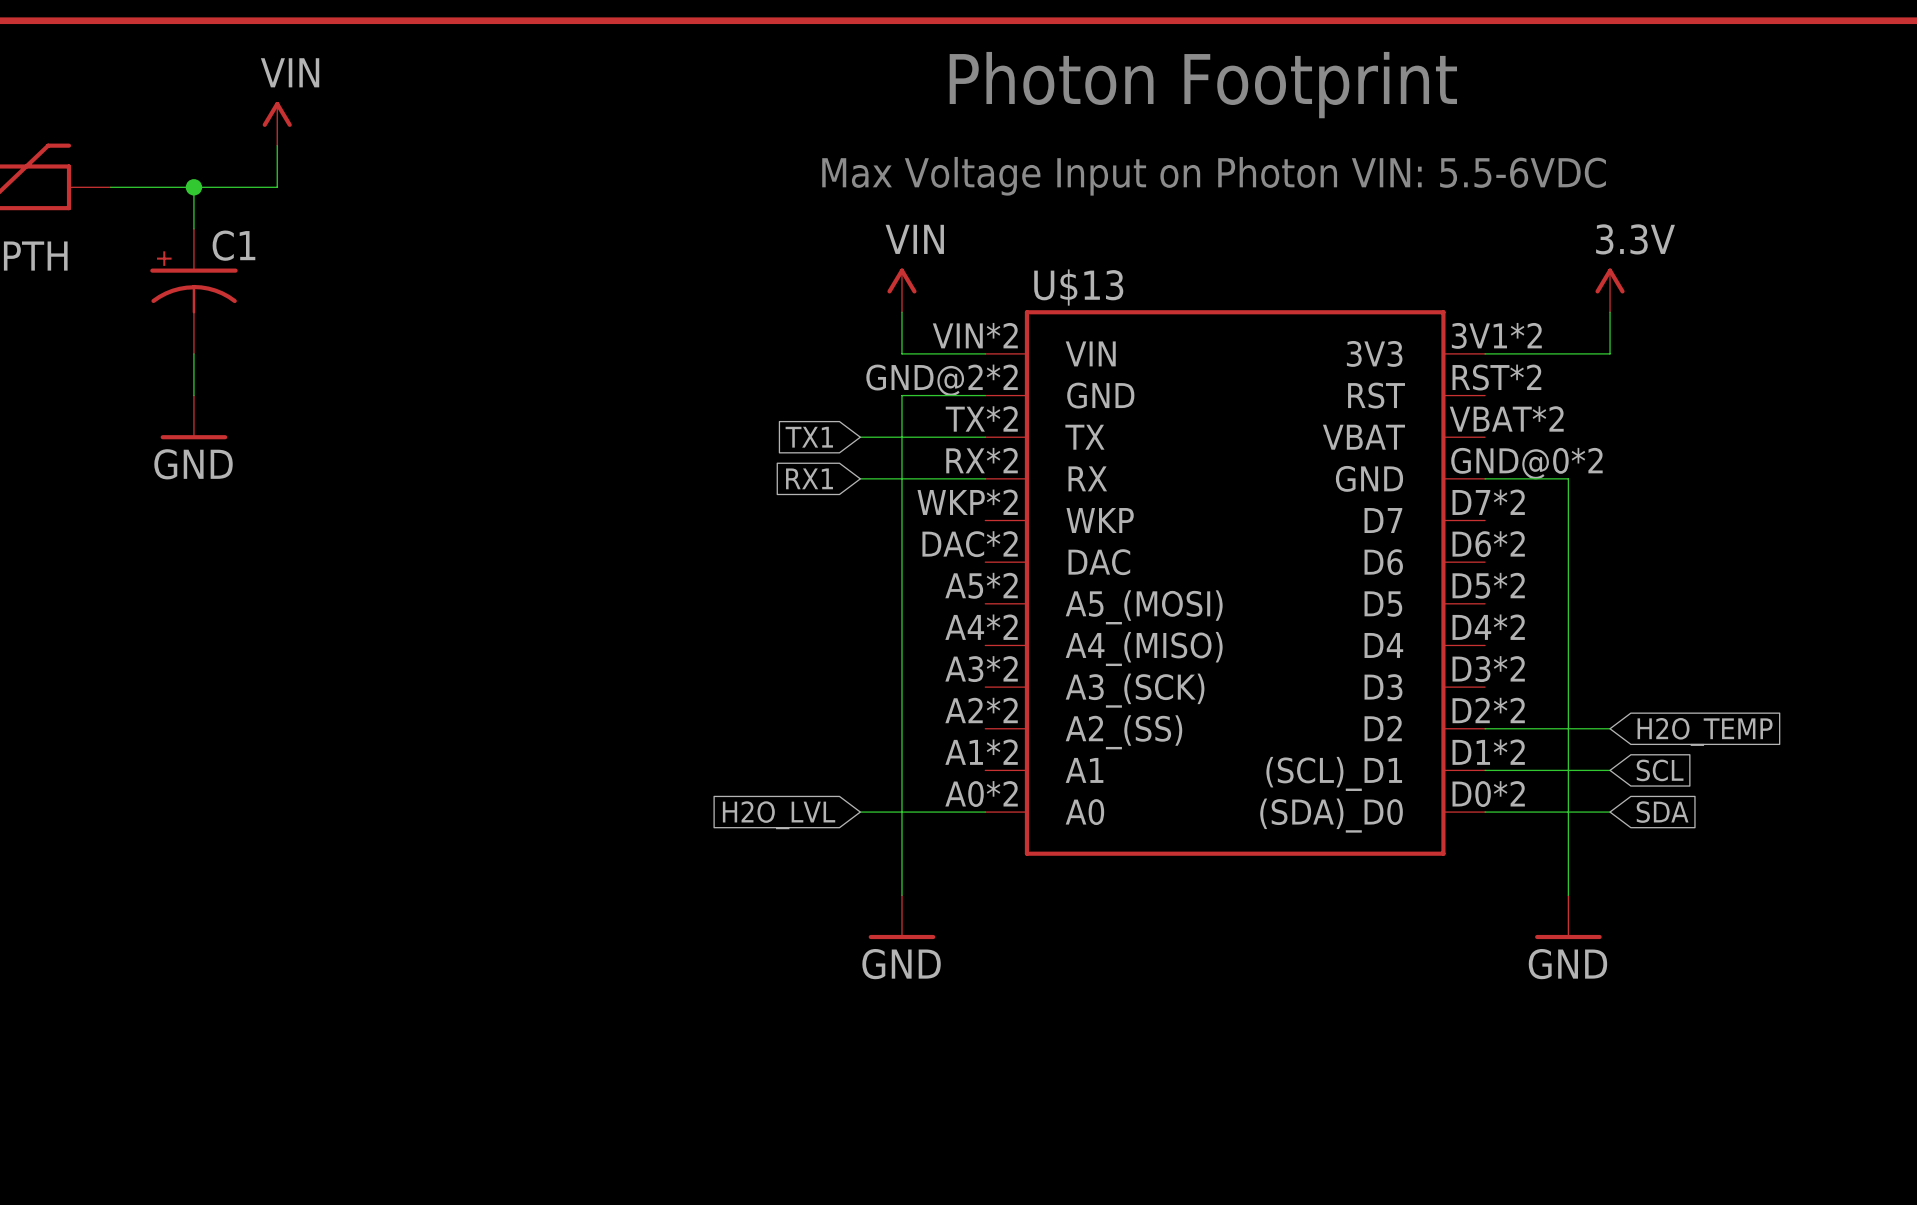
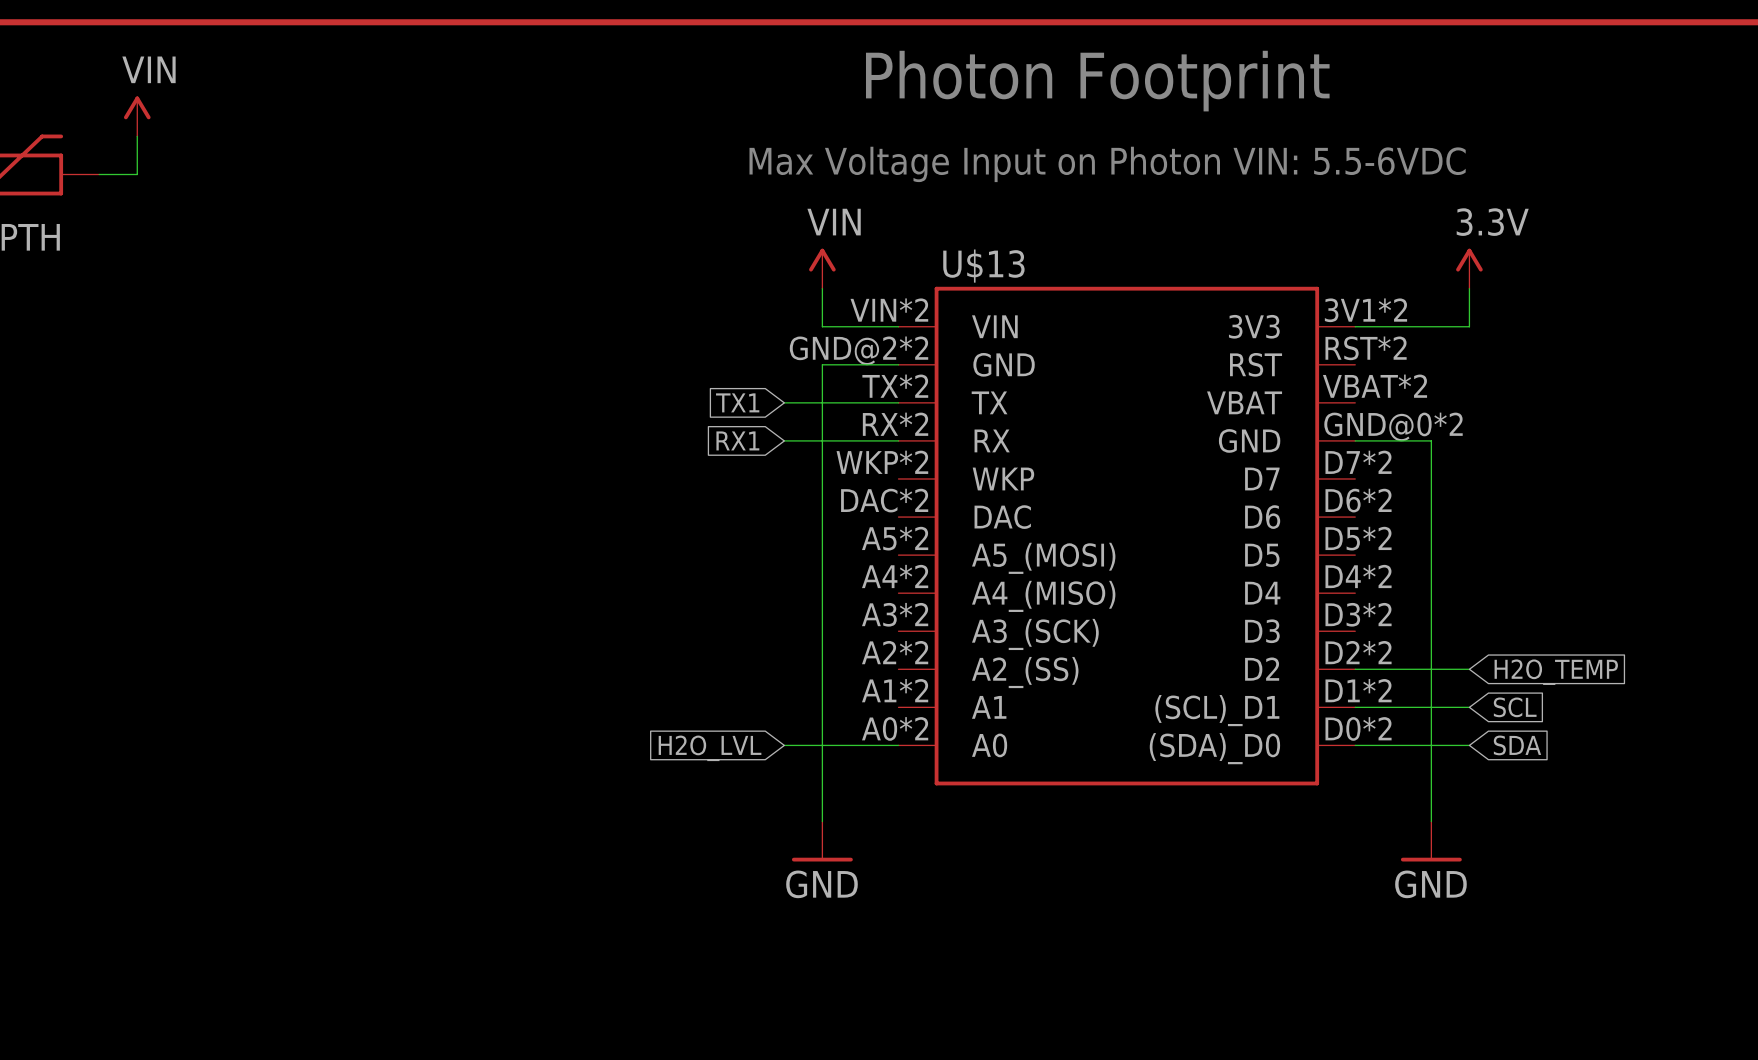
power symbol position: VIN (277, 123) -> VIN (137, 116)
wire: (277, 145) (277, 187) (152, 187) -> (137, 136) (137, 174)
wire: (193, 187) (193, 228) -> none
junction: (193, 187) -> none
C1: (193, 291) -> none
wire: (193, 353) (193, 395) -> none
power symbol: GND (193, 417) -> none

